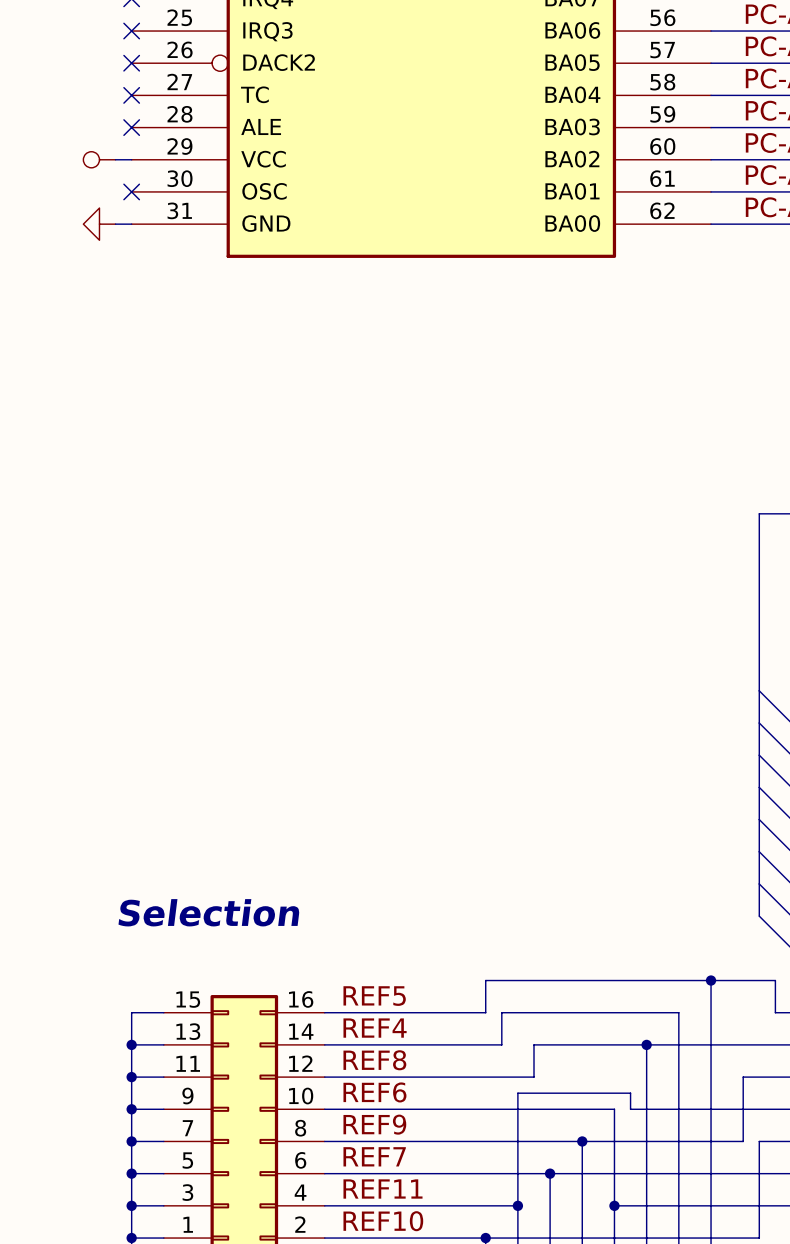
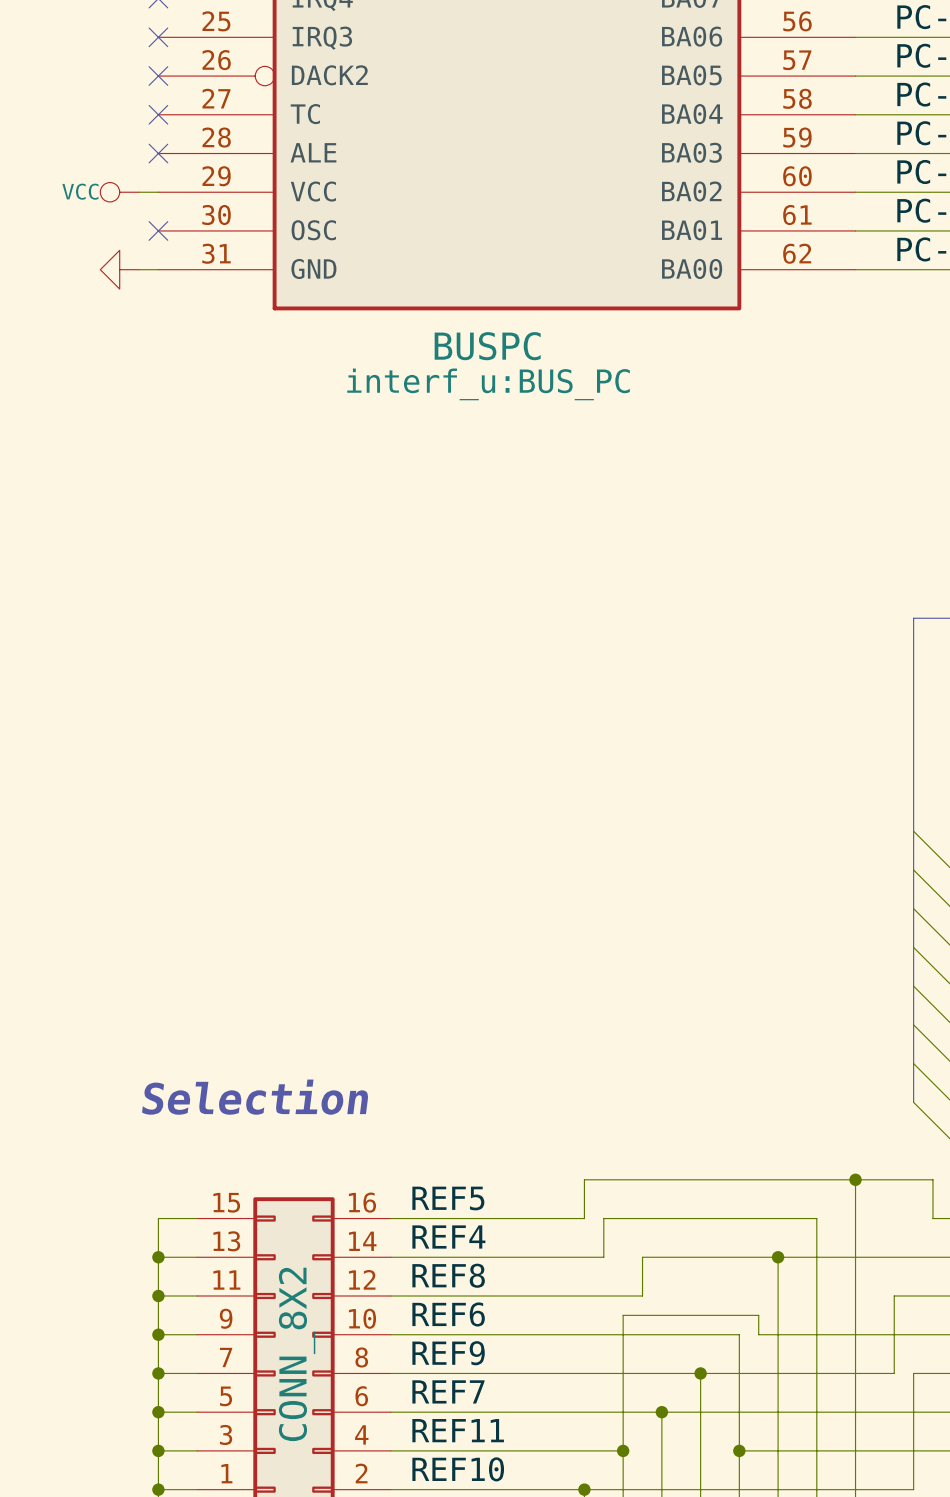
power symbol text: none -> VCC (80, 191)
part value: none -> BUSPC (487, 346)
part text: none -> interf_u:BUS_PC (488, 384)
part value: none -> CONN_8X2 (297, 1354)

